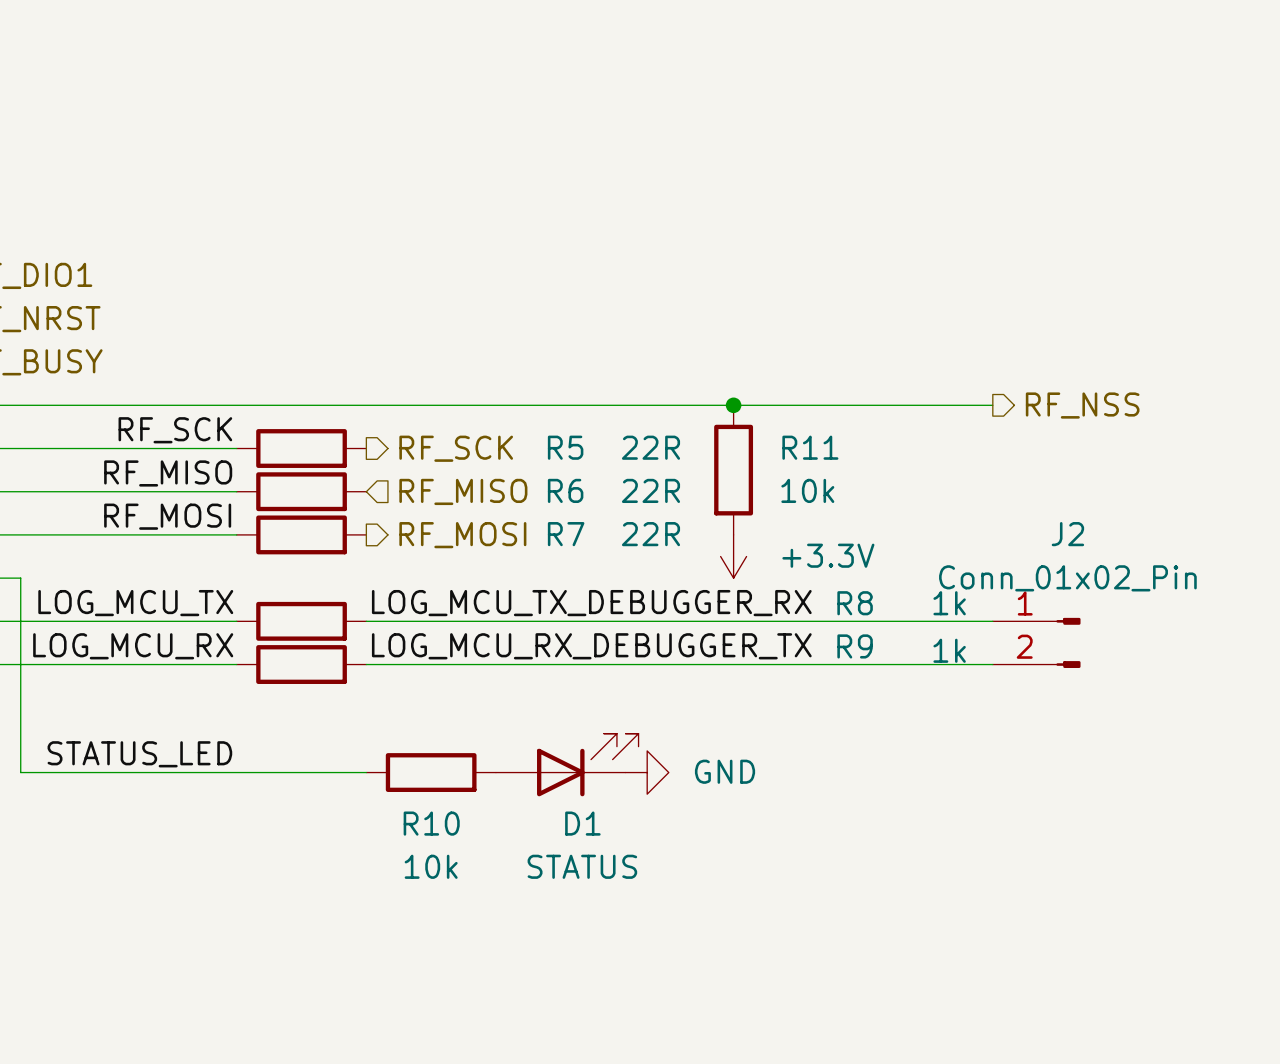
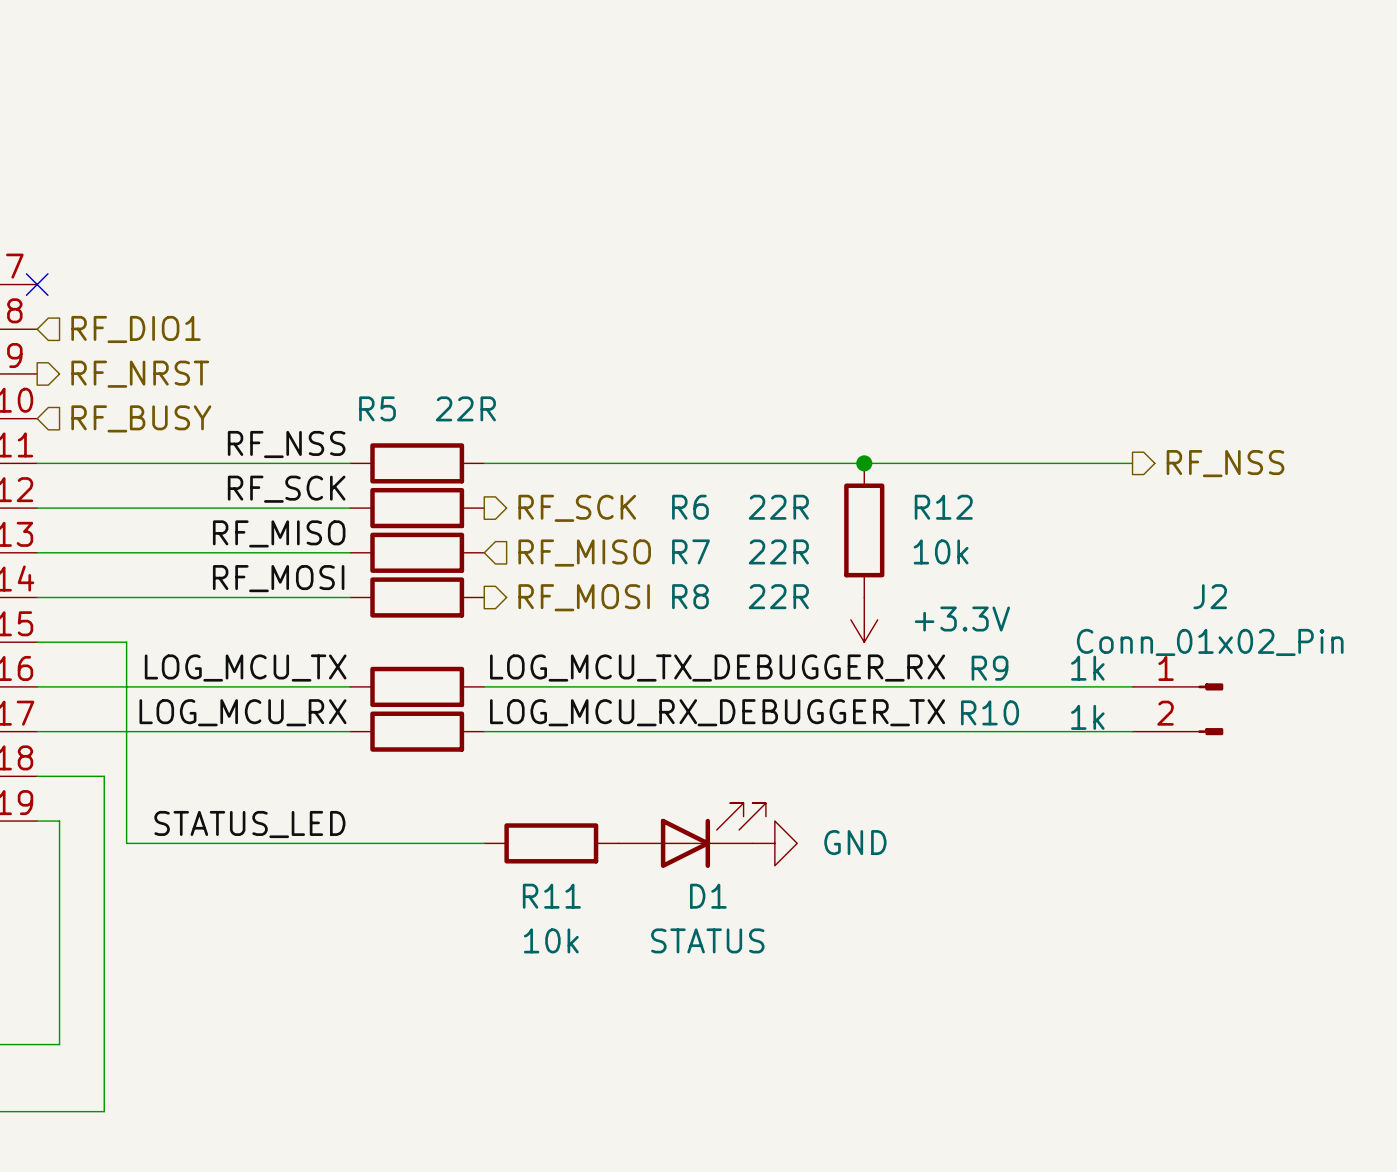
label: none -> RF_NSS (286, 444)
wire: (236, 405) (366, 405) -> none
R5: none -> 22R (417, 463)
R5 name: R5 (565, 447) -> R6 (690, 507)
R11 name: R11 (810, 447) -> R12 (943, 507)
R6 name: R6 (565, 490) -> R7 (690, 551)
R7 name: R7 (566, 534) -> R8 (690, 596)
R8 name: R8 (855, 603) -> R9 (989, 668)
R9 name: R9 (855, 646) -> R10 (989, 712)
R10 name: R10 (431, 823) -> R11 (551, 896)

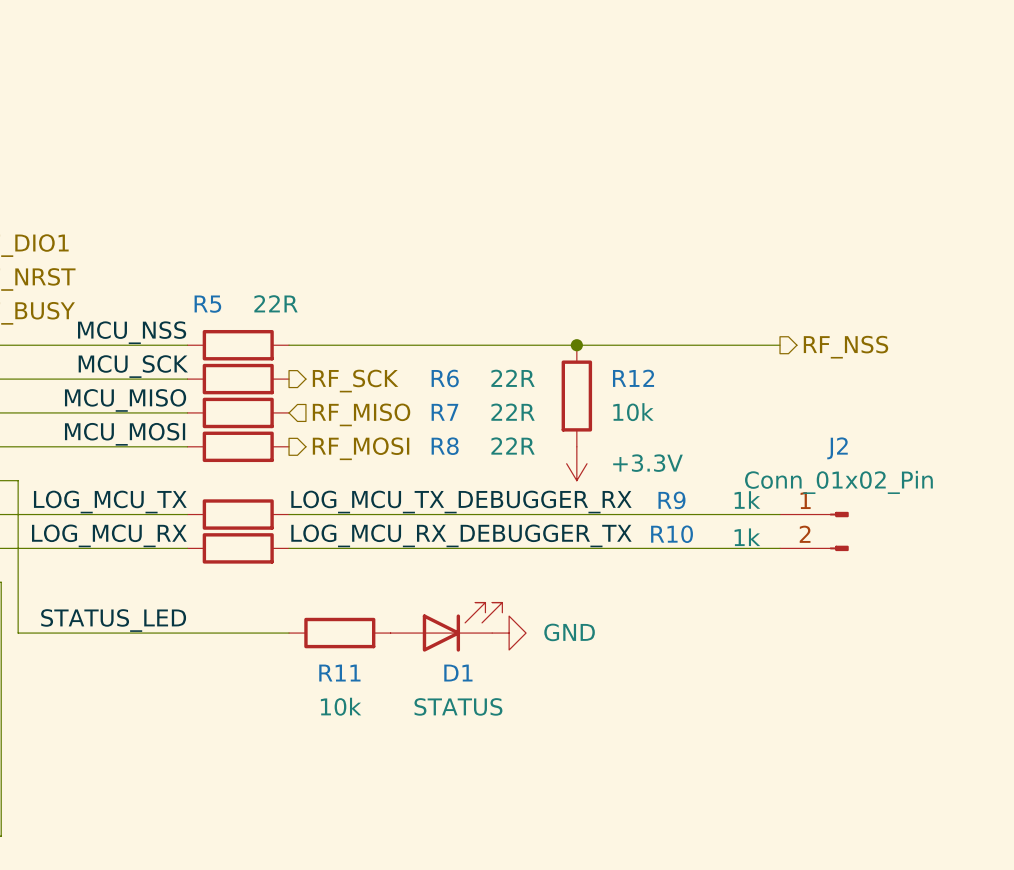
label: RF_NSS (286, 444) -> MCU_NSS (132, 332)
label: RF_SCK (286, 489) -> MCU_SCK (133, 366)
label: RF_MISO (279, 533) -> MCU_MISO (125, 400)
label: RF_MOSI (278, 578) -> MCU_MOSI (125, 434)

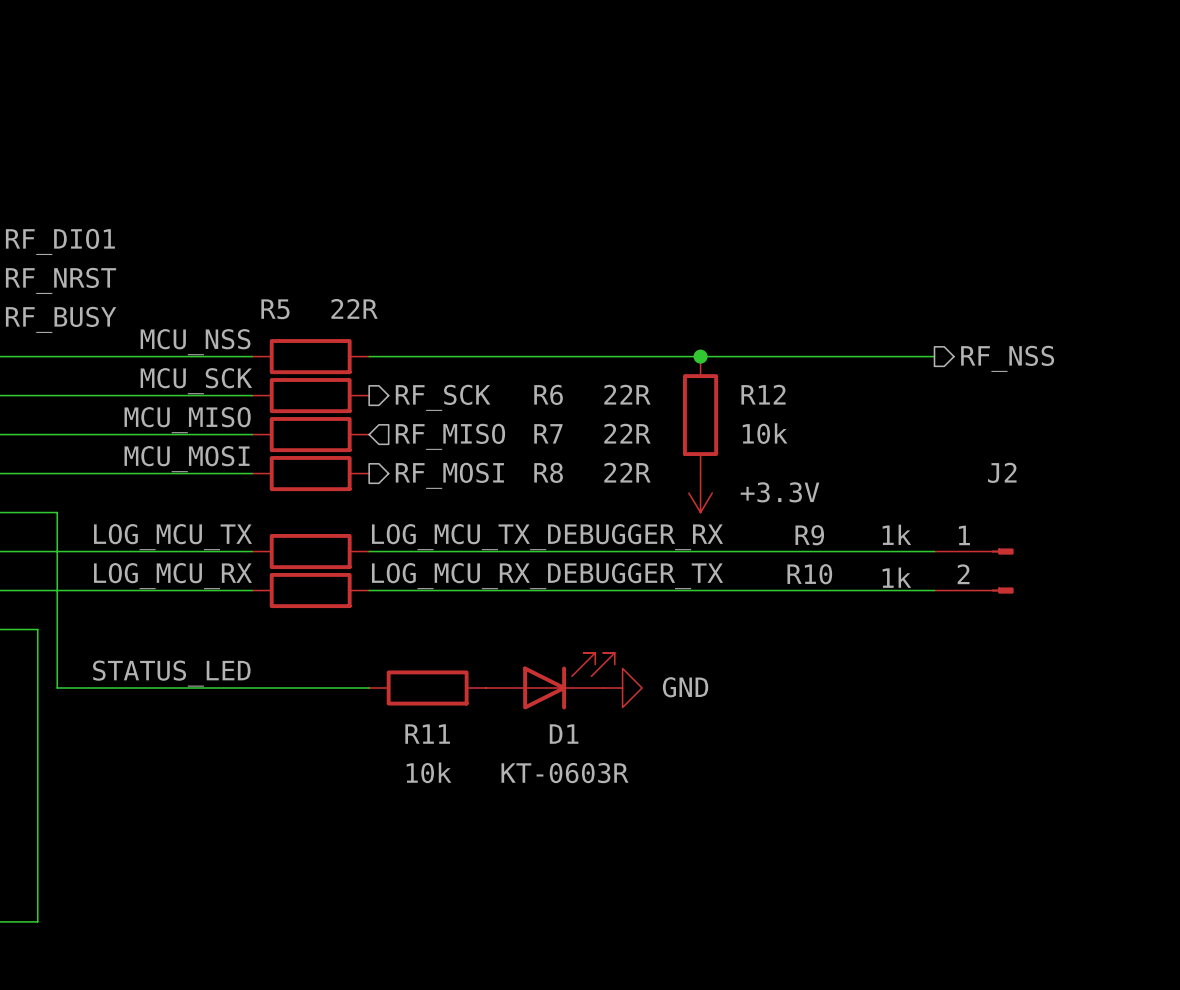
J2 value: Conn_01x02_Pin (838, 482) -> none
D1 value: STATUS (458, 706) -> KT-0603R (565, 773)

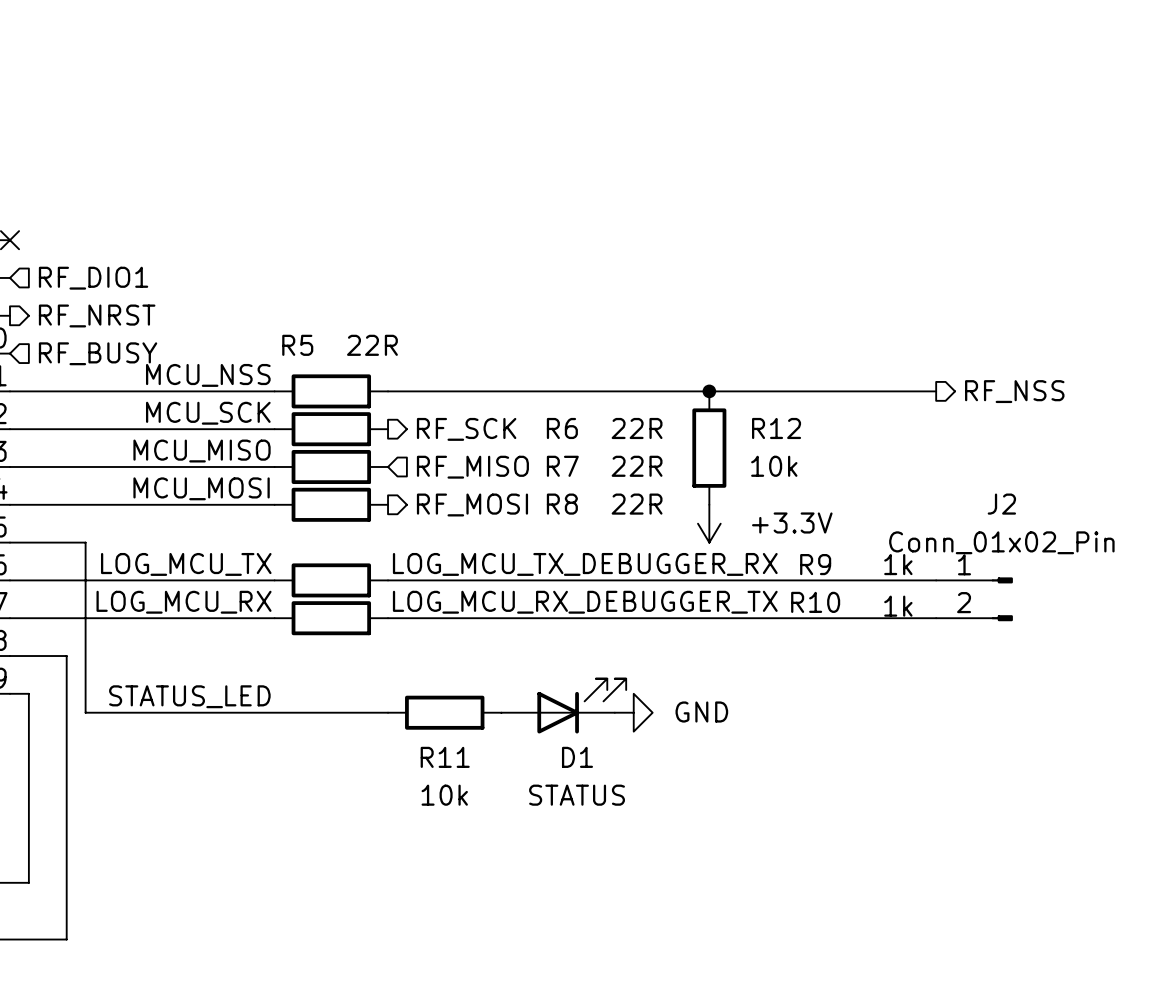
J2 value: none -> Conn_01x02_Pin (1001, 542)
D1 value: KT-0603R (565, 773) -> STATUS (577, 795)

